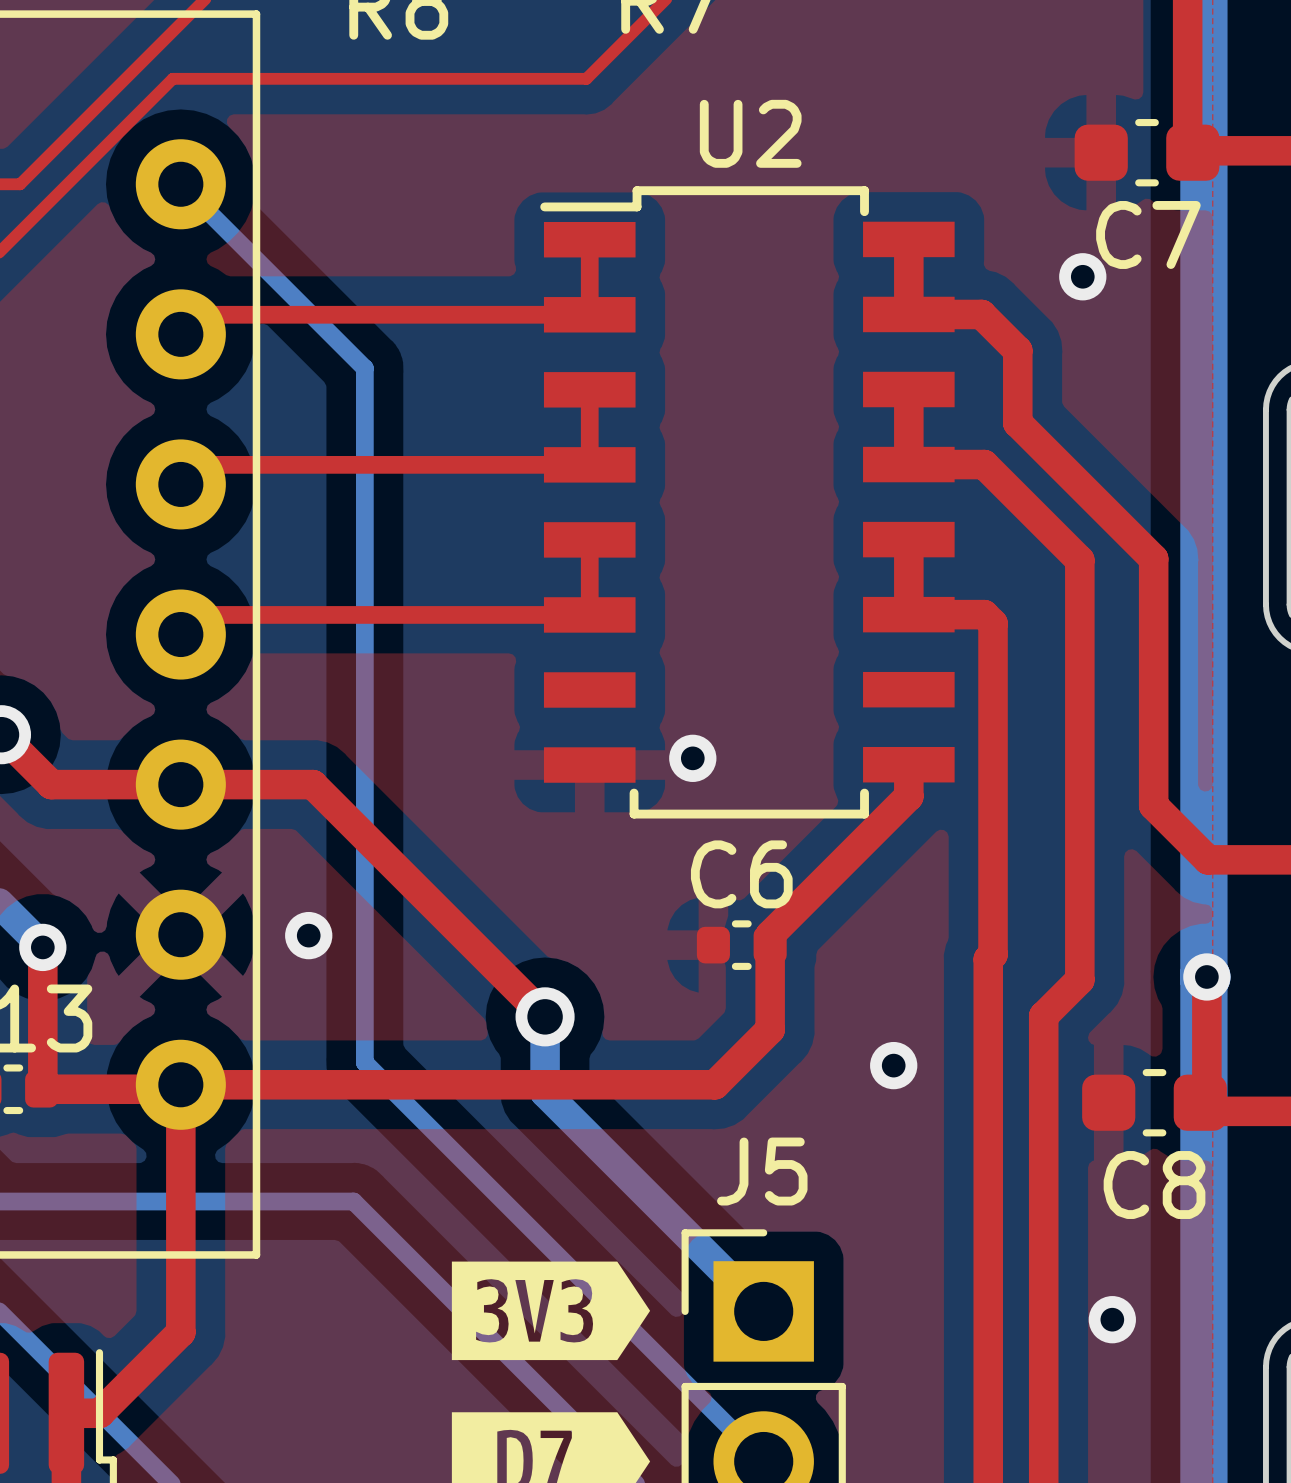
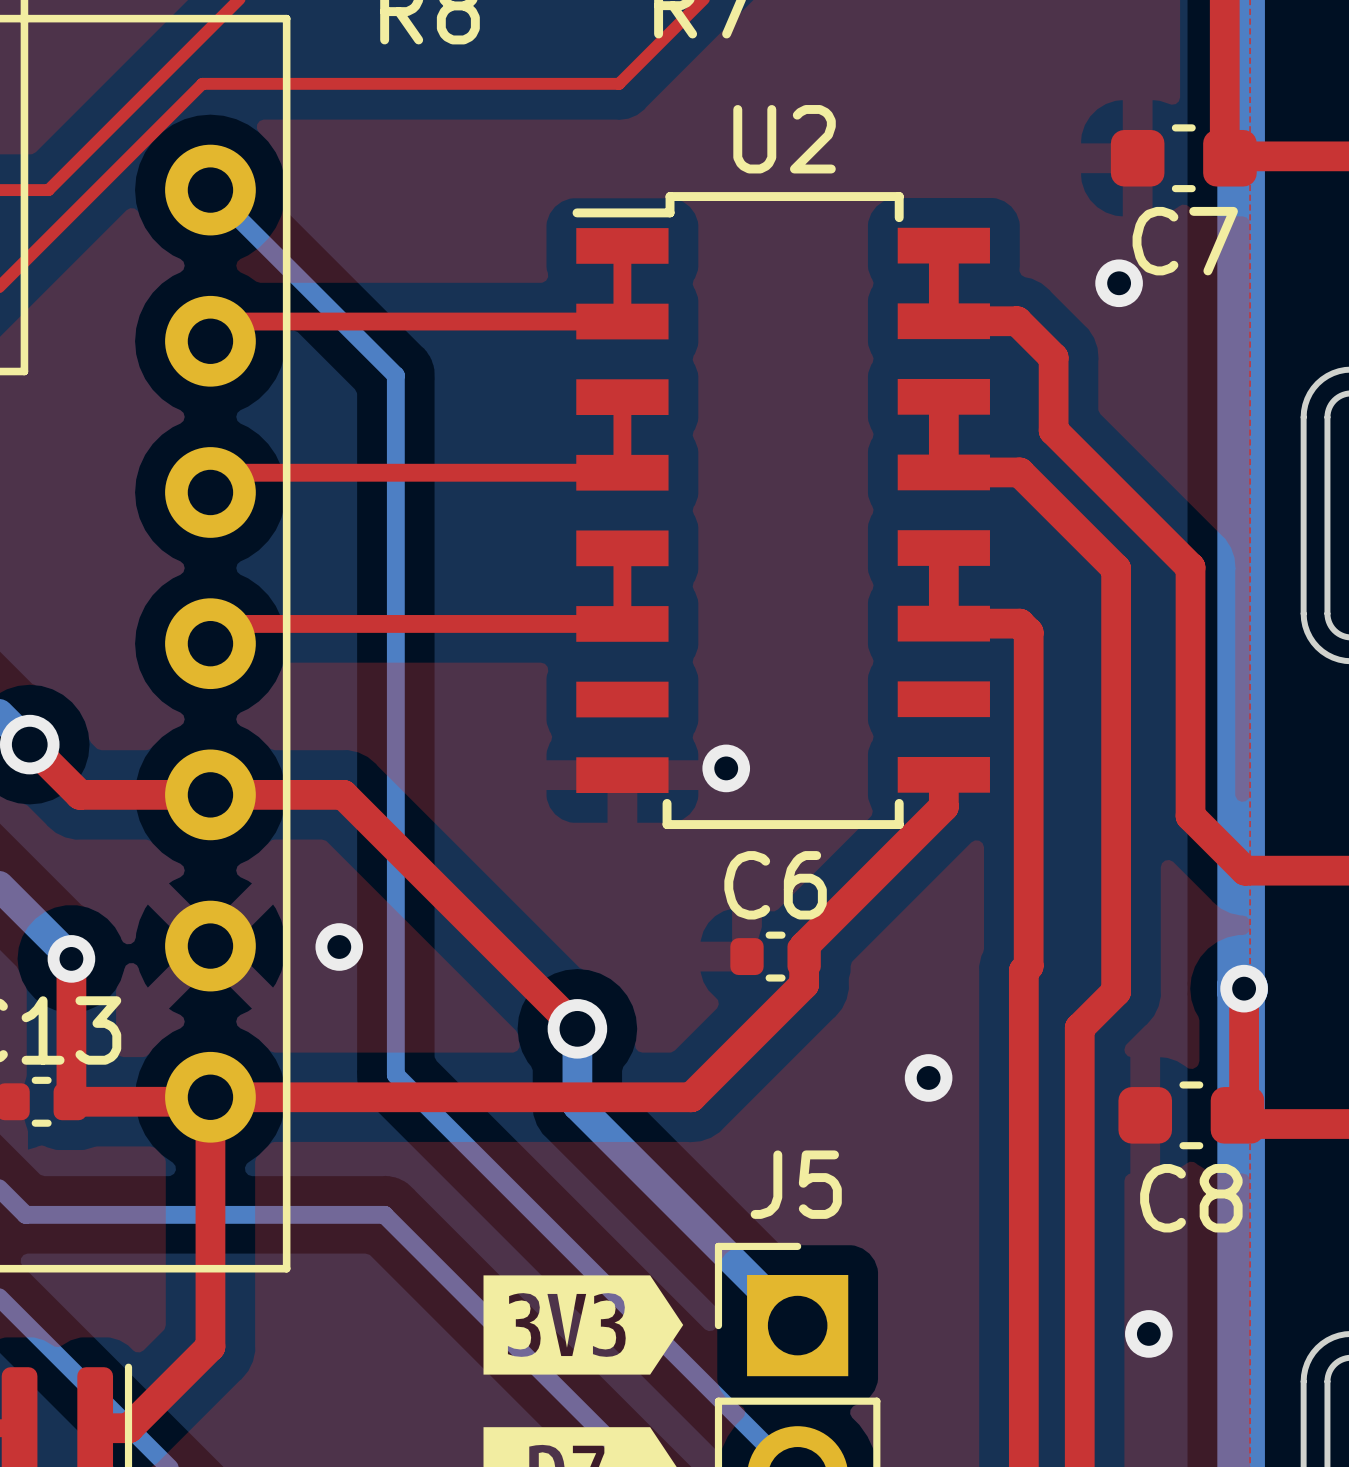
top track: (770, 972) (770, 1029) (714, 1084) (658, 1084) -> (804, 984) (691, 1097)

